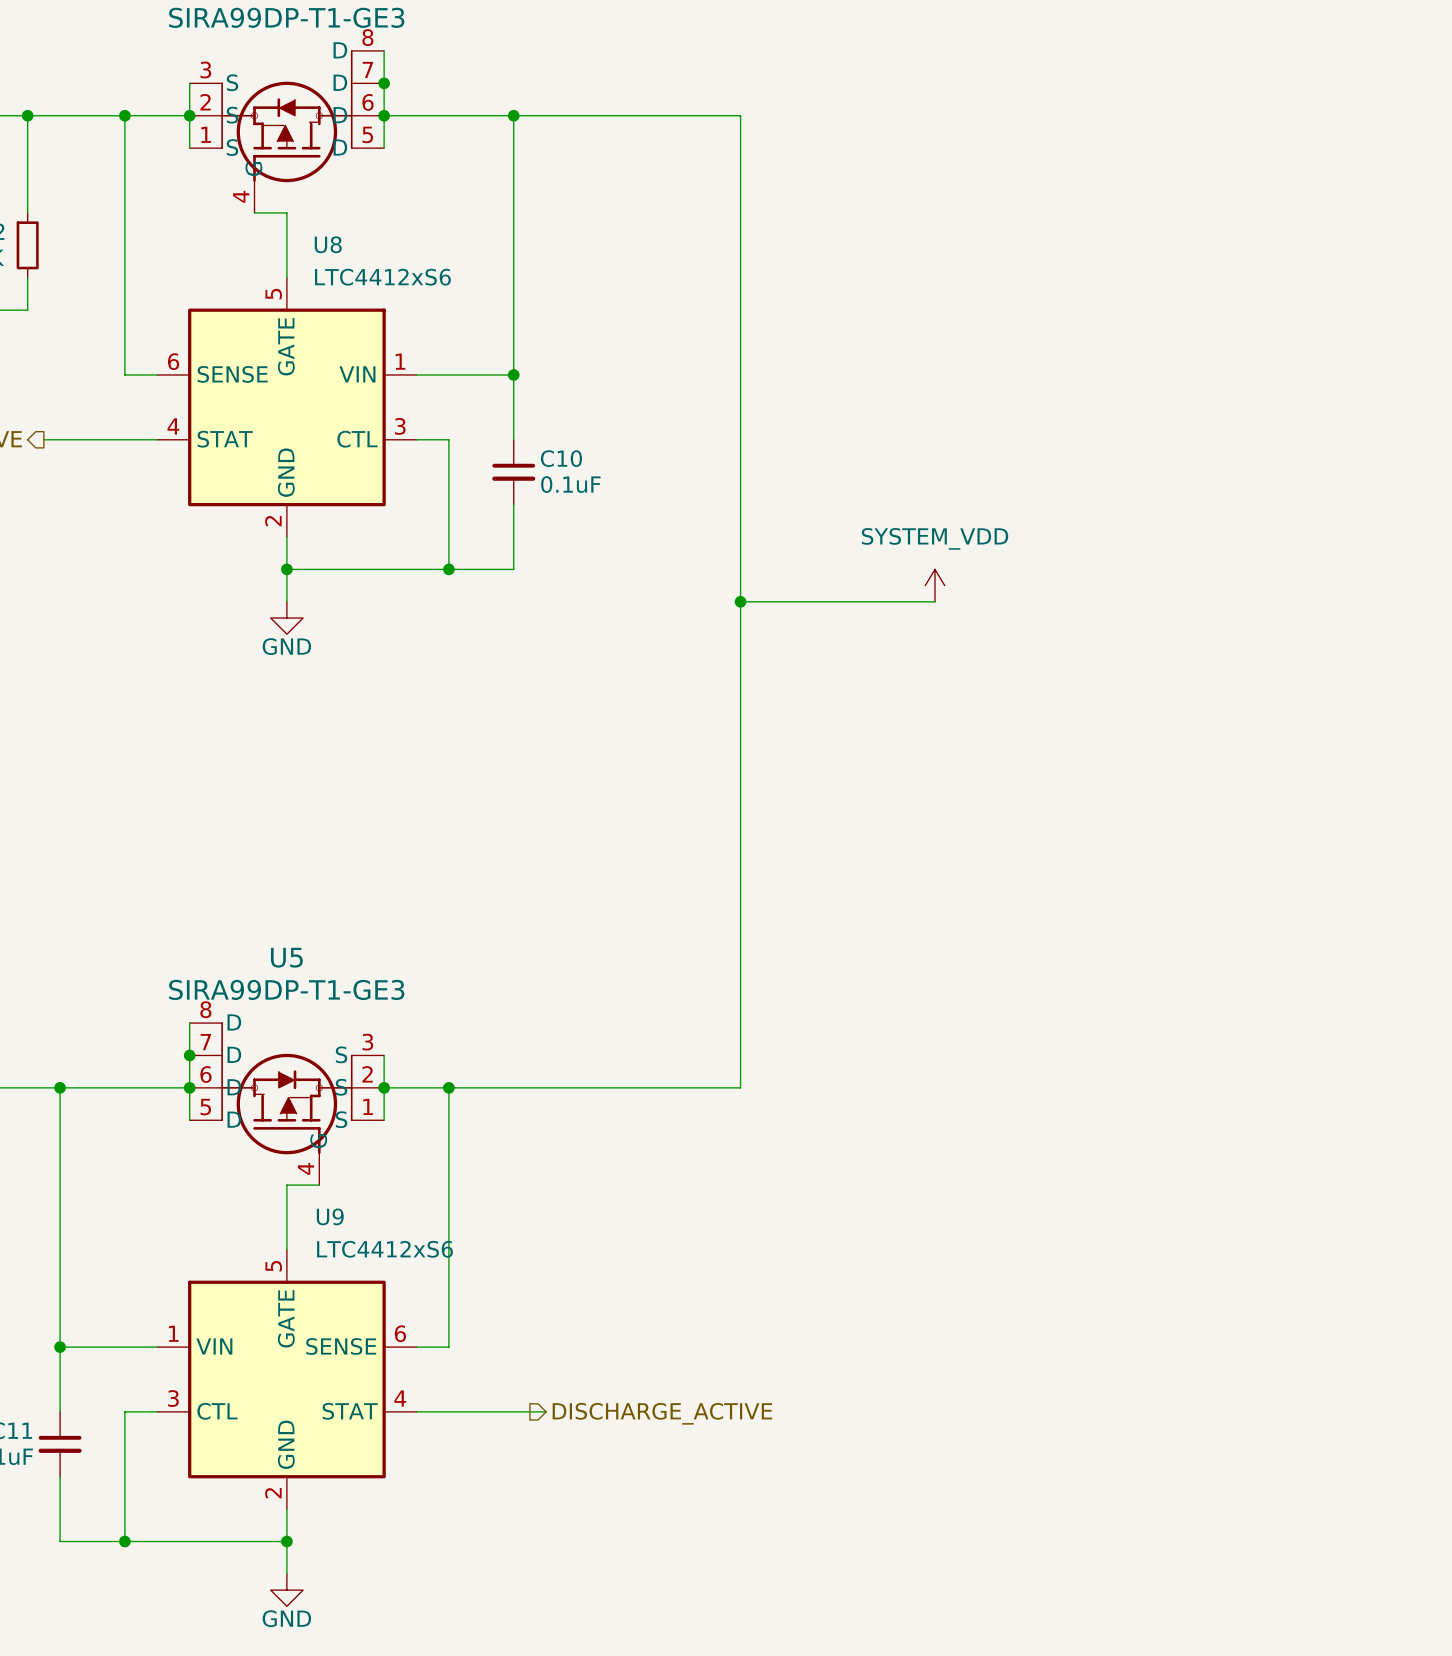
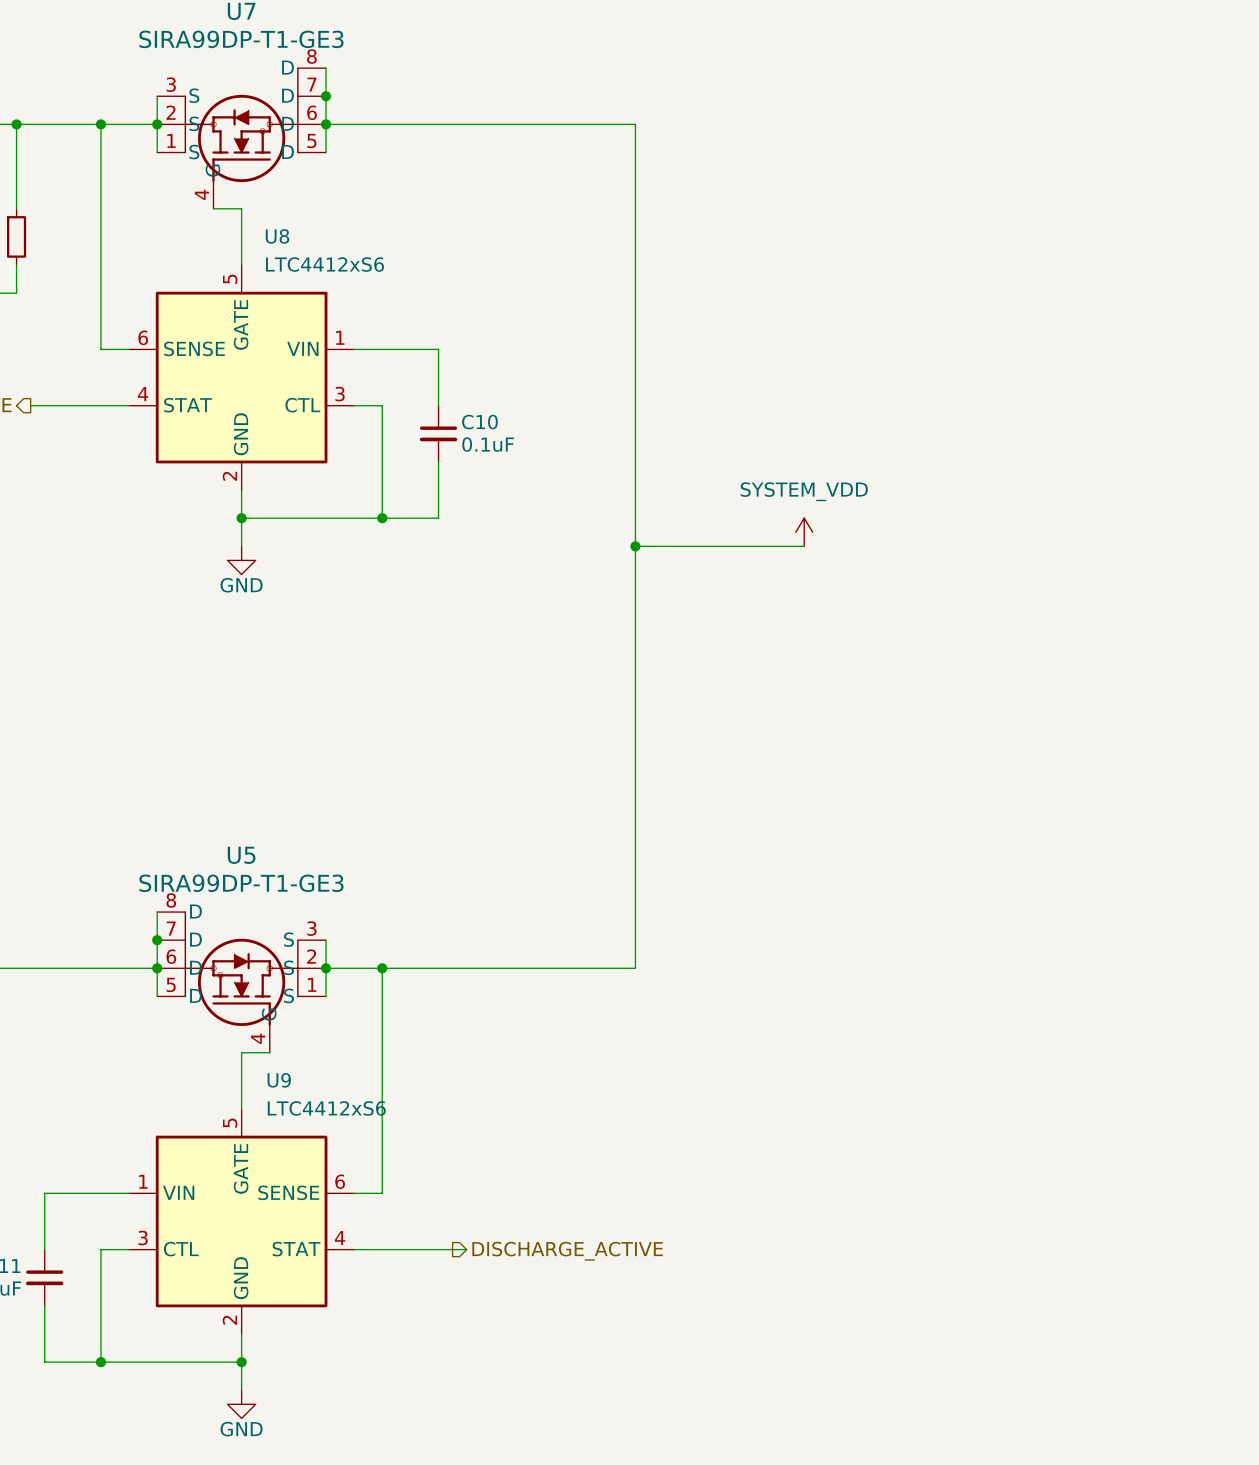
U7 symbol: [189, 50, 385, 213] -> [157, 67, 327, 209]
wire: (513, 115) (513, 374) -> none
junction: (513, 115) -> none
junction: (513, 374) -> none
U5 symbol: [189, 1022, 385, 1186] -> [157, 911, 327, 1053]
wire: (60, 1087) (60, 1347) -> none
junction: (60, 1087) -> none
junction: (60, 1347) -> none

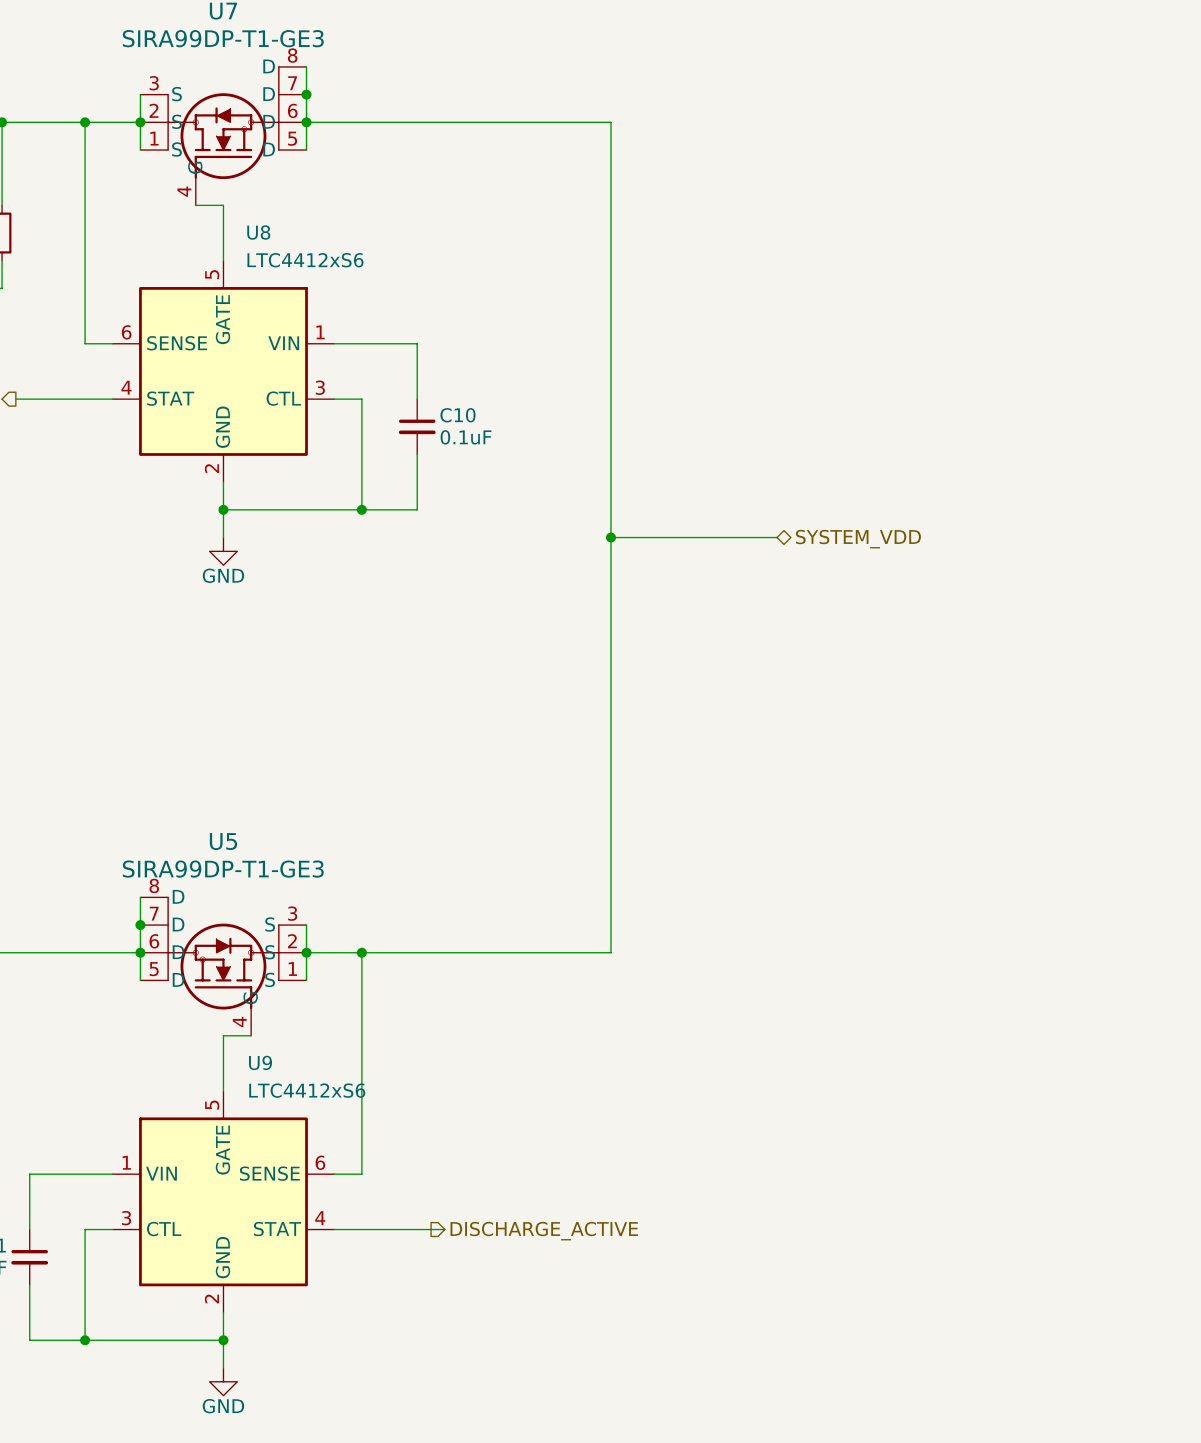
power symbol: SYSTEM_VDD (804, 532) -> none
hierarchical label: none -> SYSTEM_VDD (858, 539)

